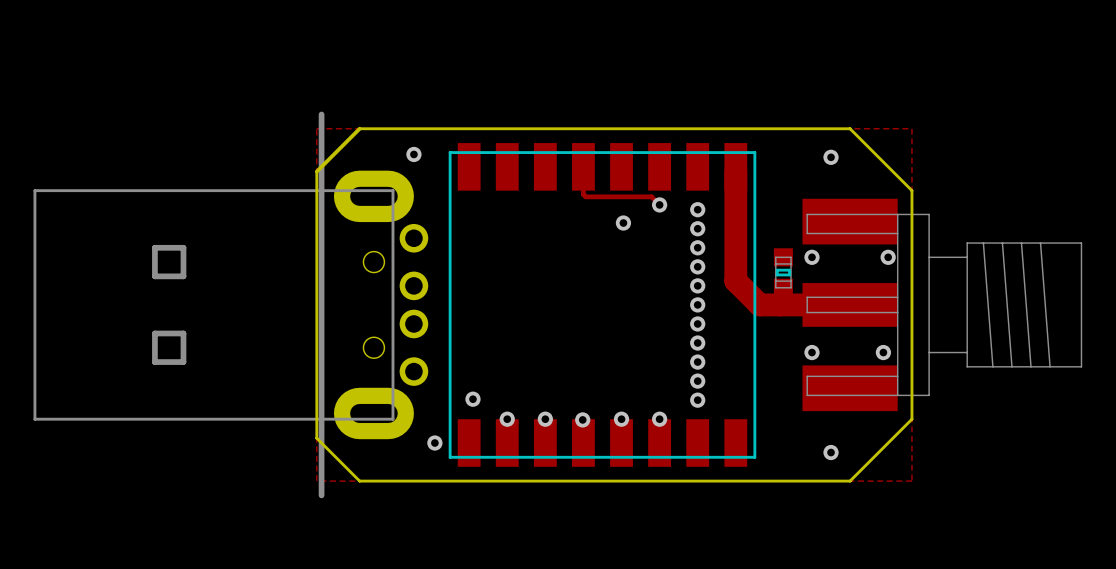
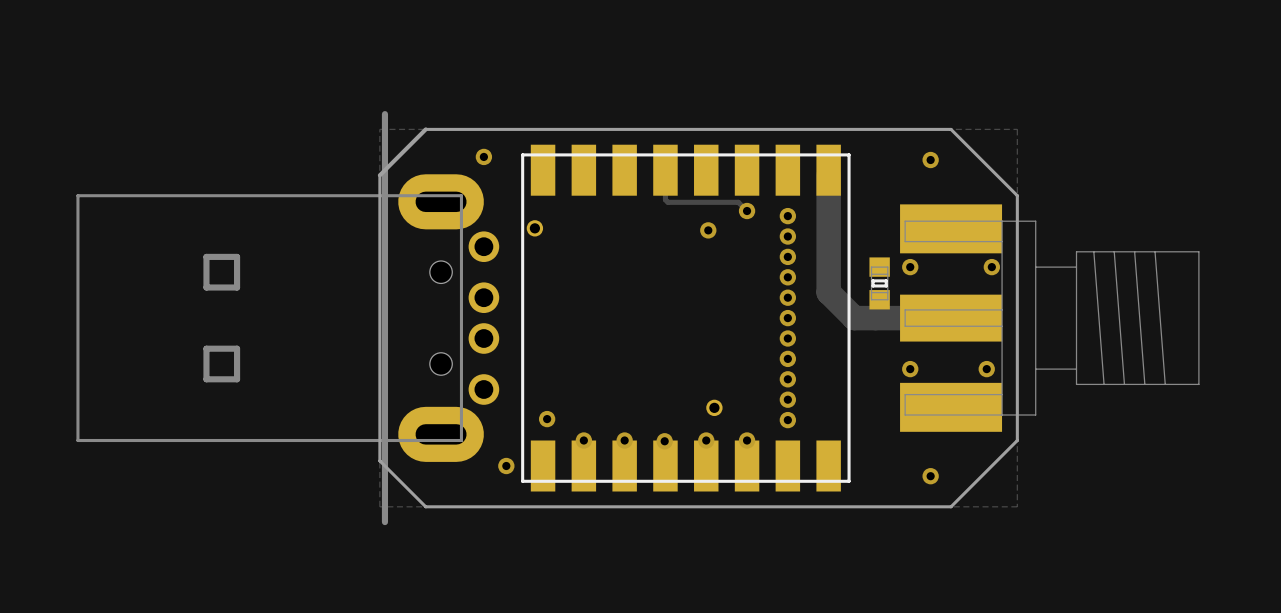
part: none -> (534, 228)
part: none -> (714, 407)

